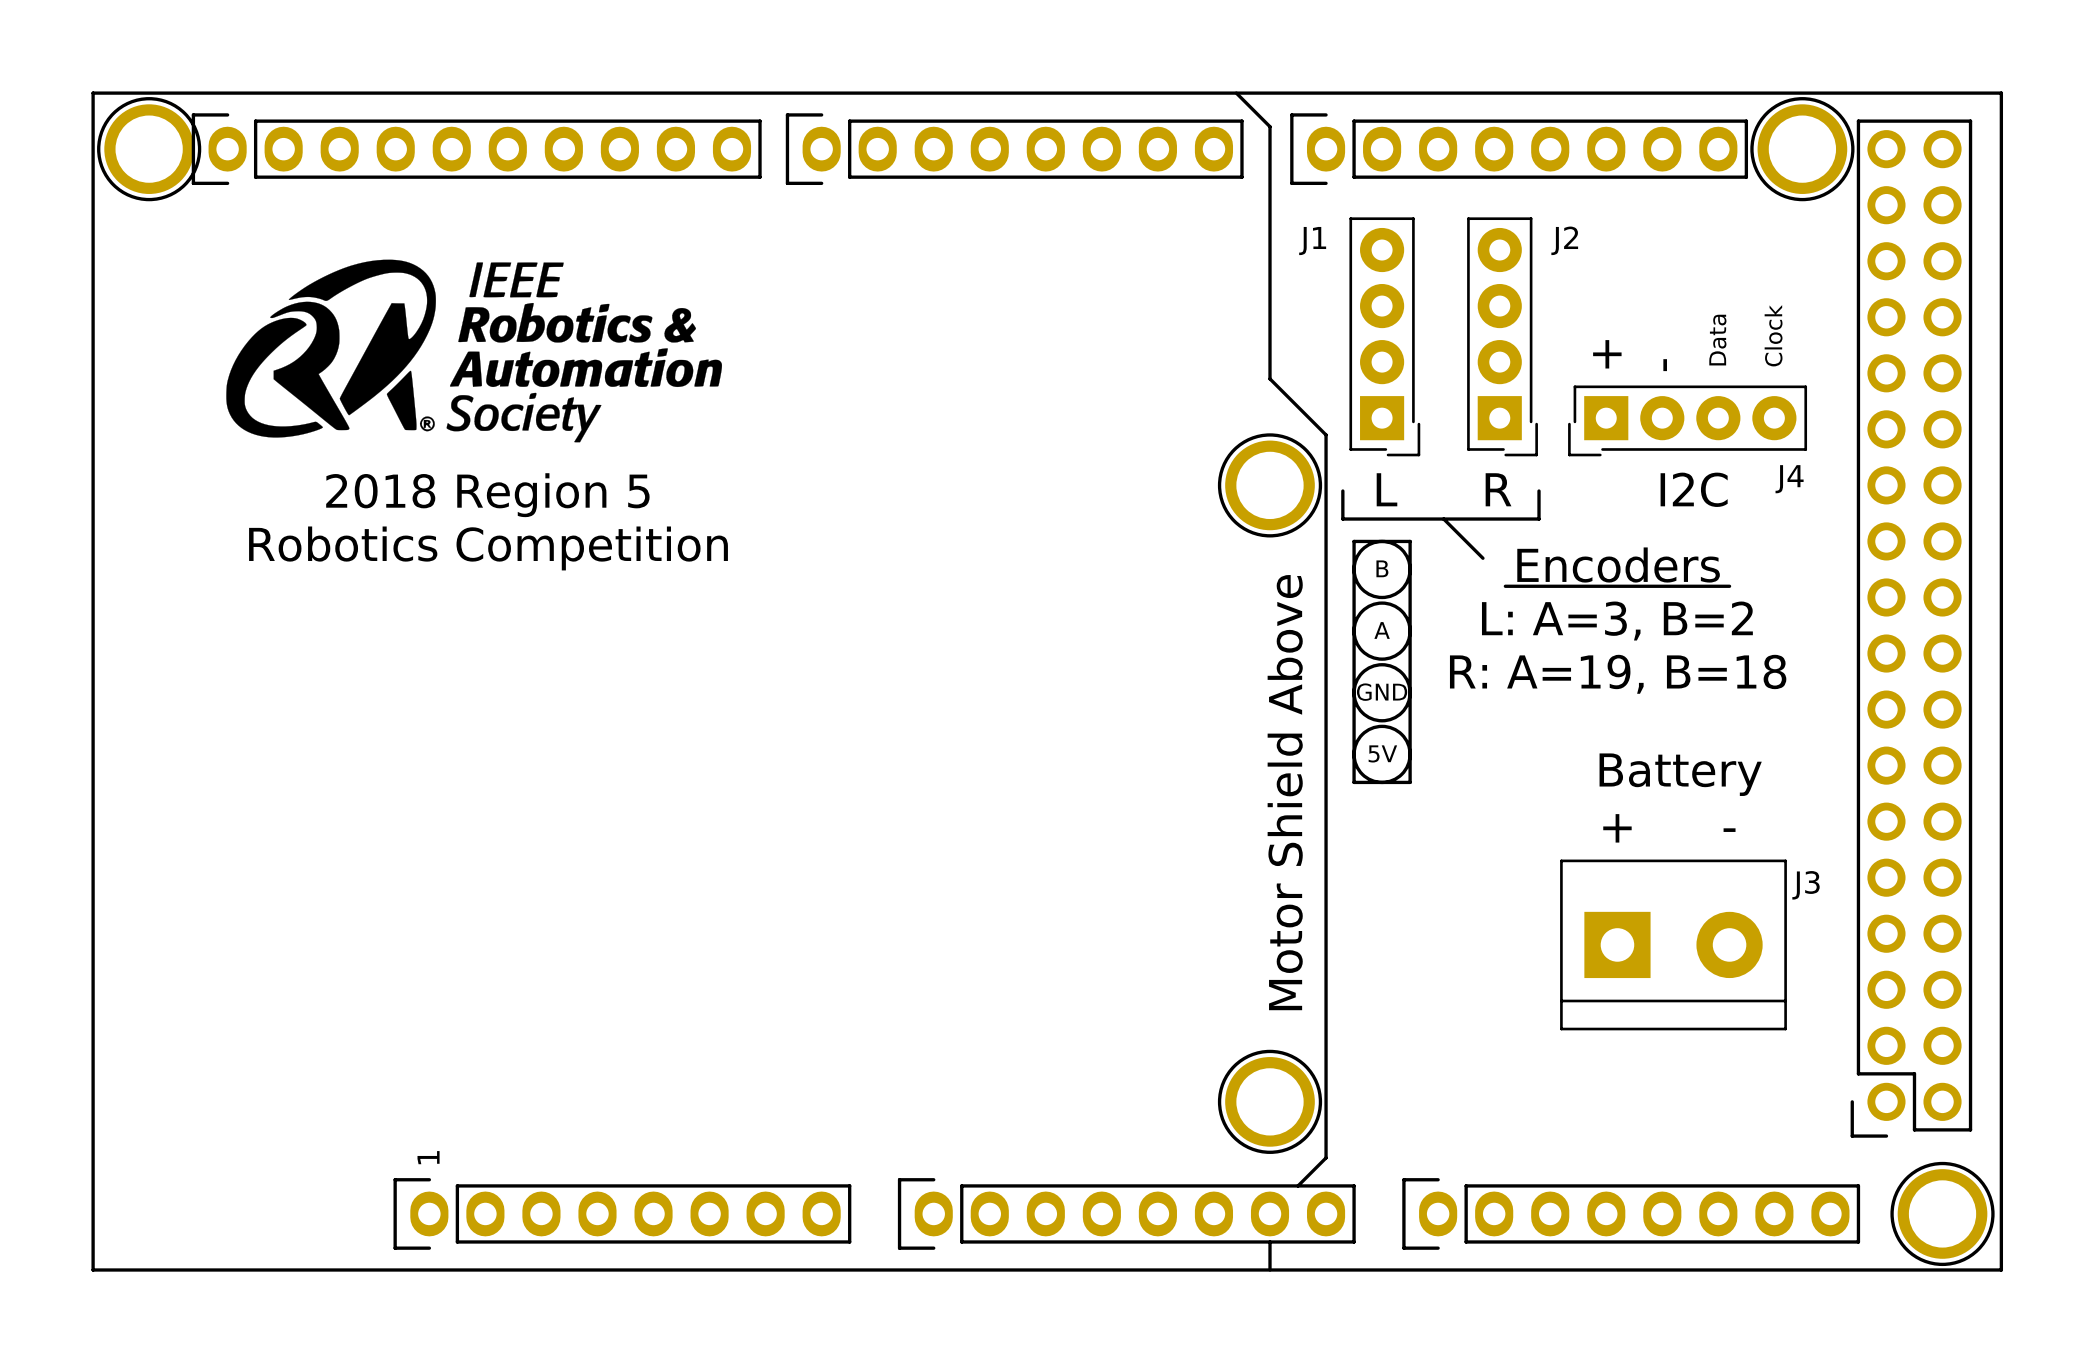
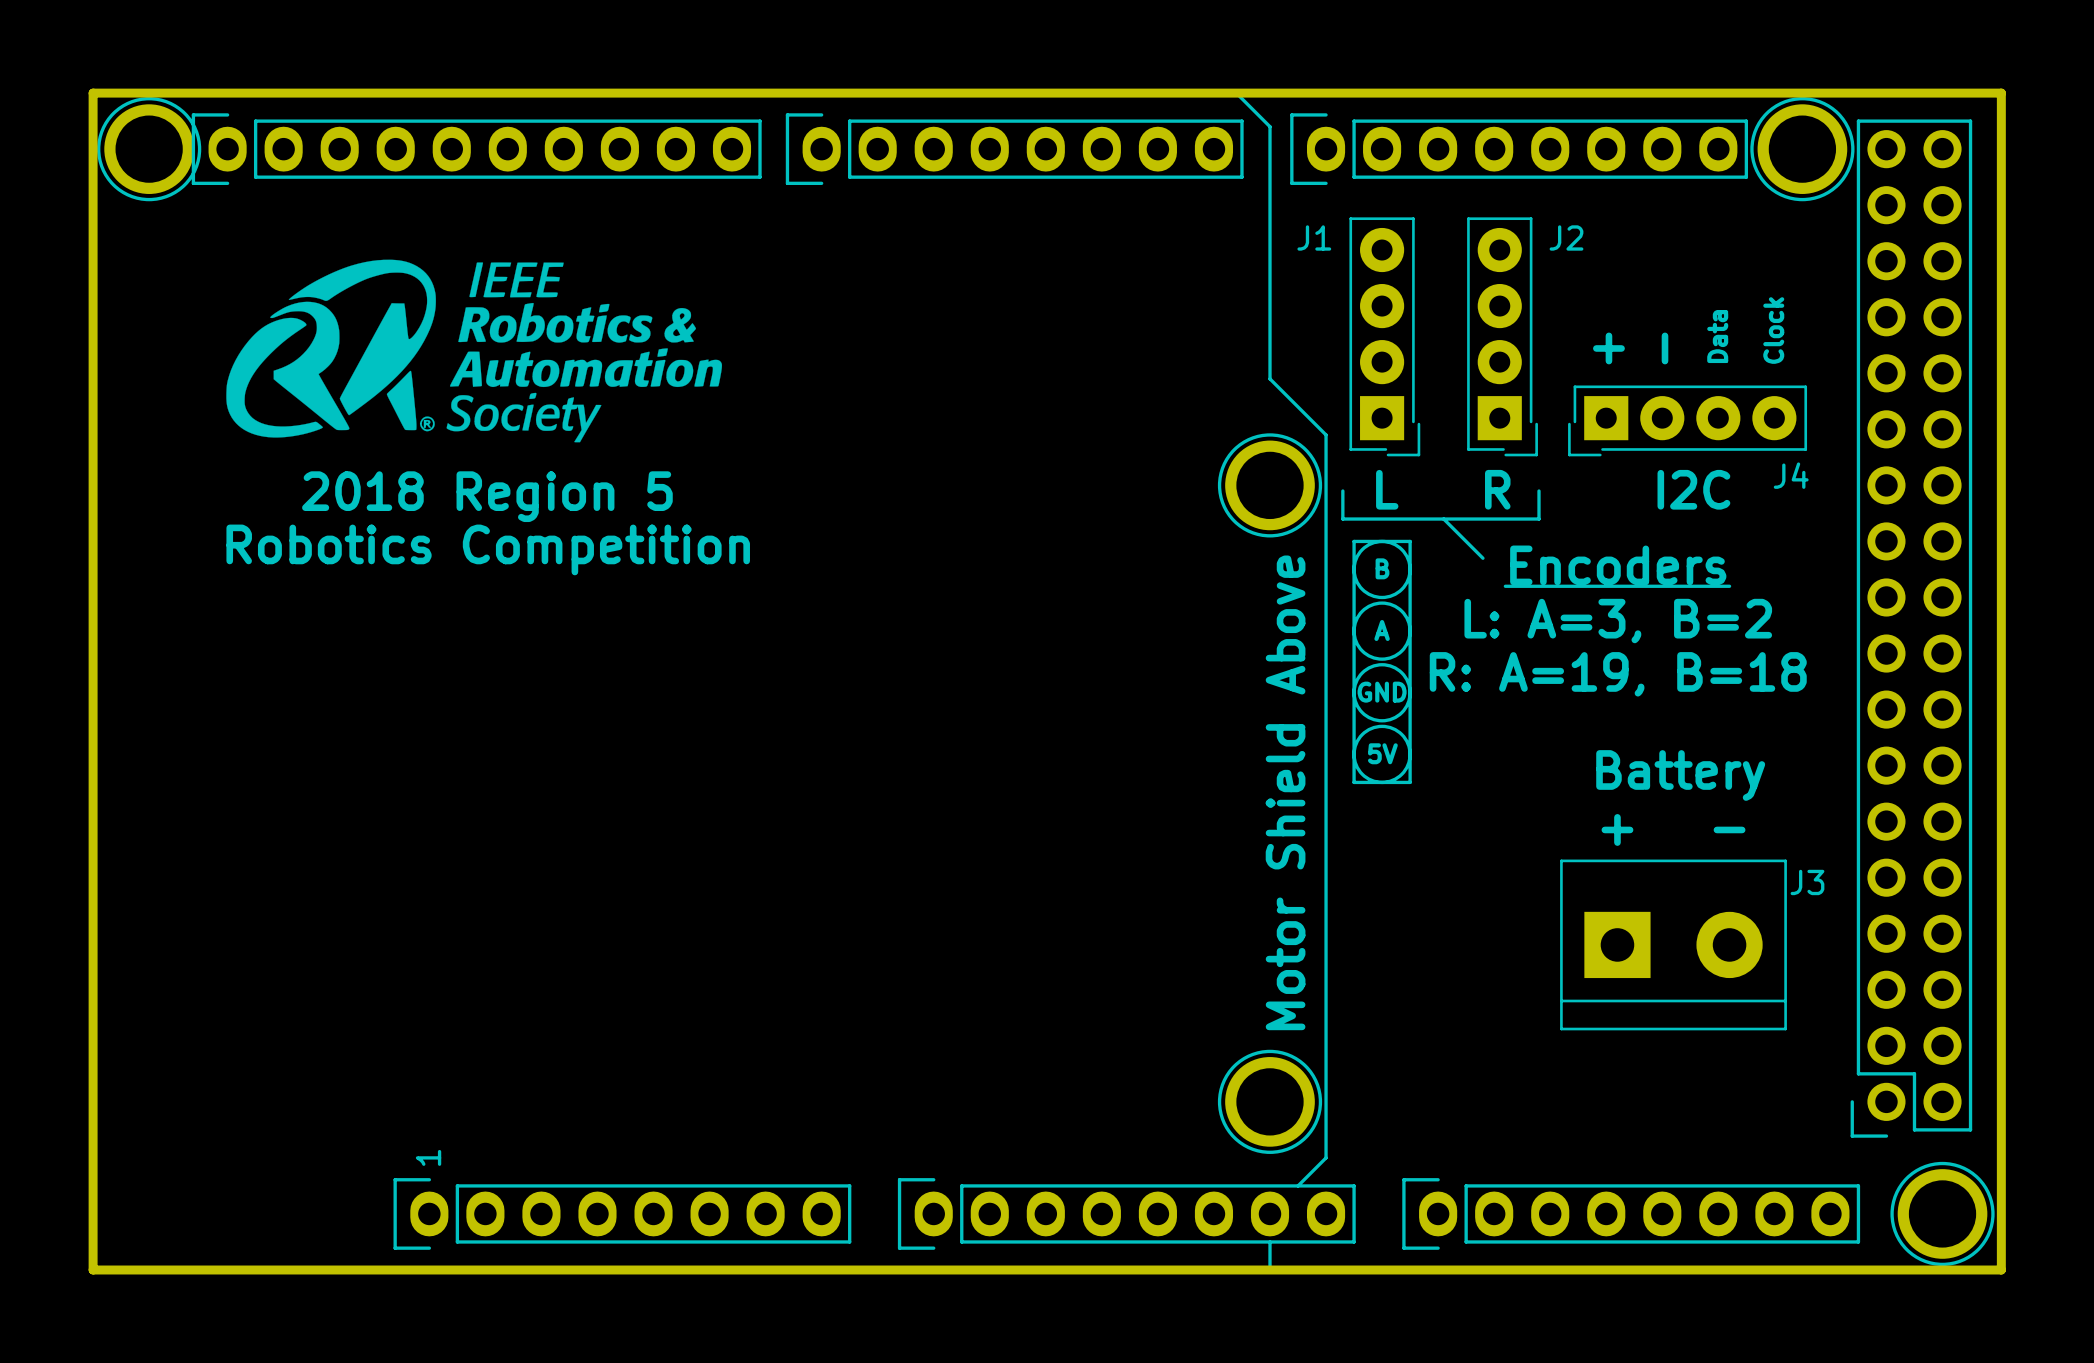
board edge width: thin (93, 93) (2001, 93) (2001, 1270) (93, 1270) (93, 93) -> thick (93, 93) (2001, 93) (2001, 1270) (93, 1270) (93, 93)

